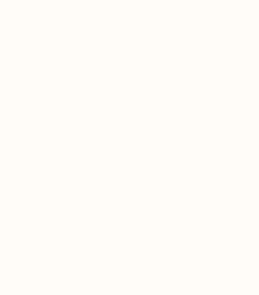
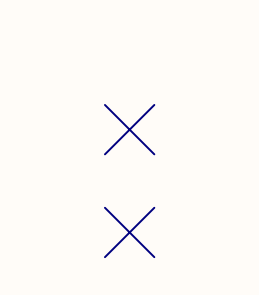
no-connect mark: none -> (129, 129)
no-connect mark: none -> (129, 232)

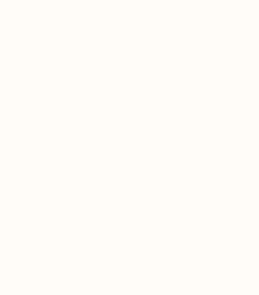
no-connect mark: (129, 129) -> none
no-connect mark: (129, 232) -> none

